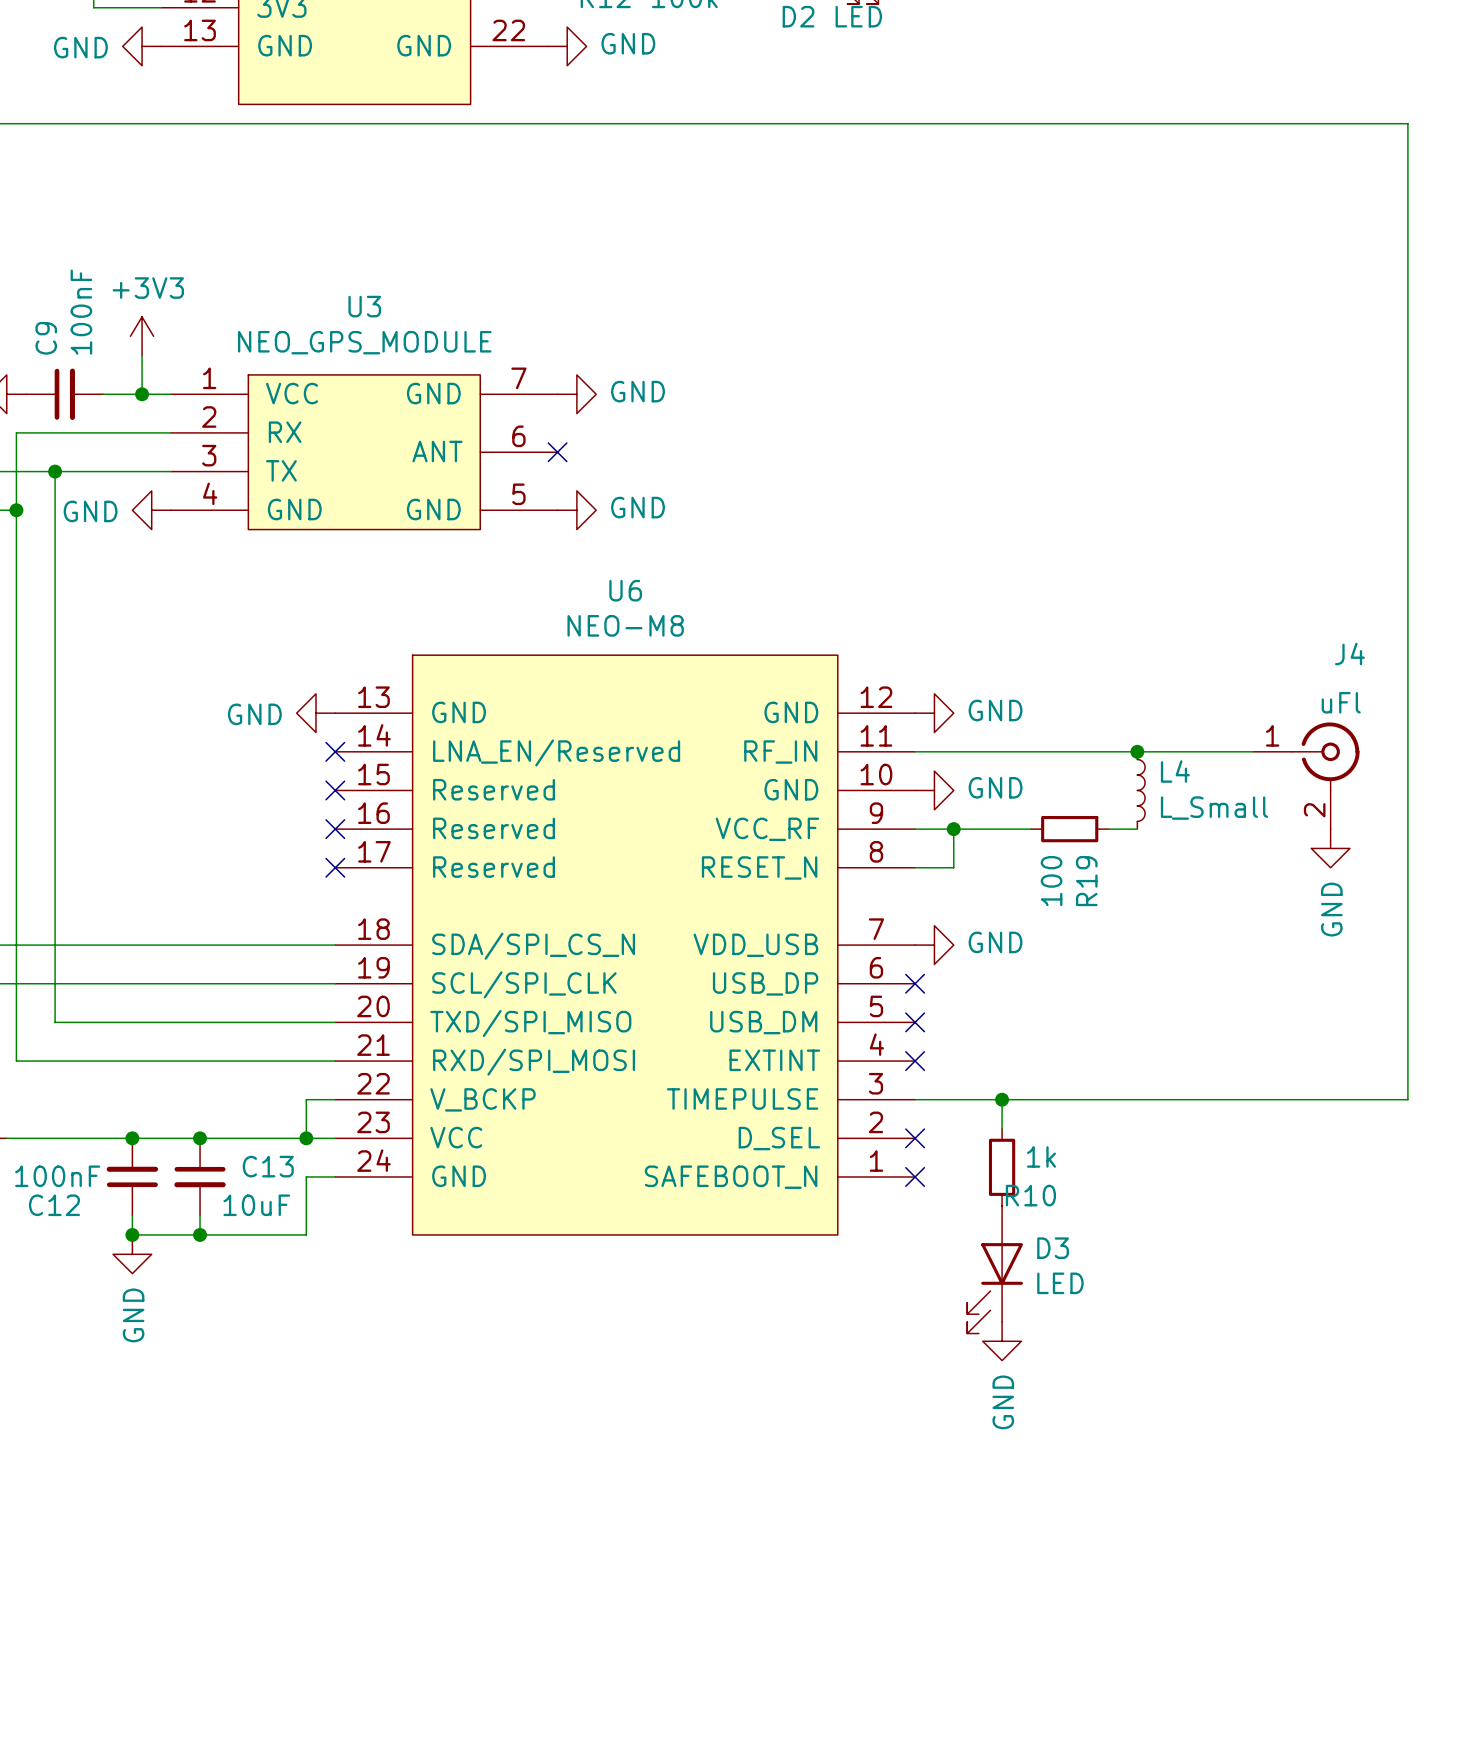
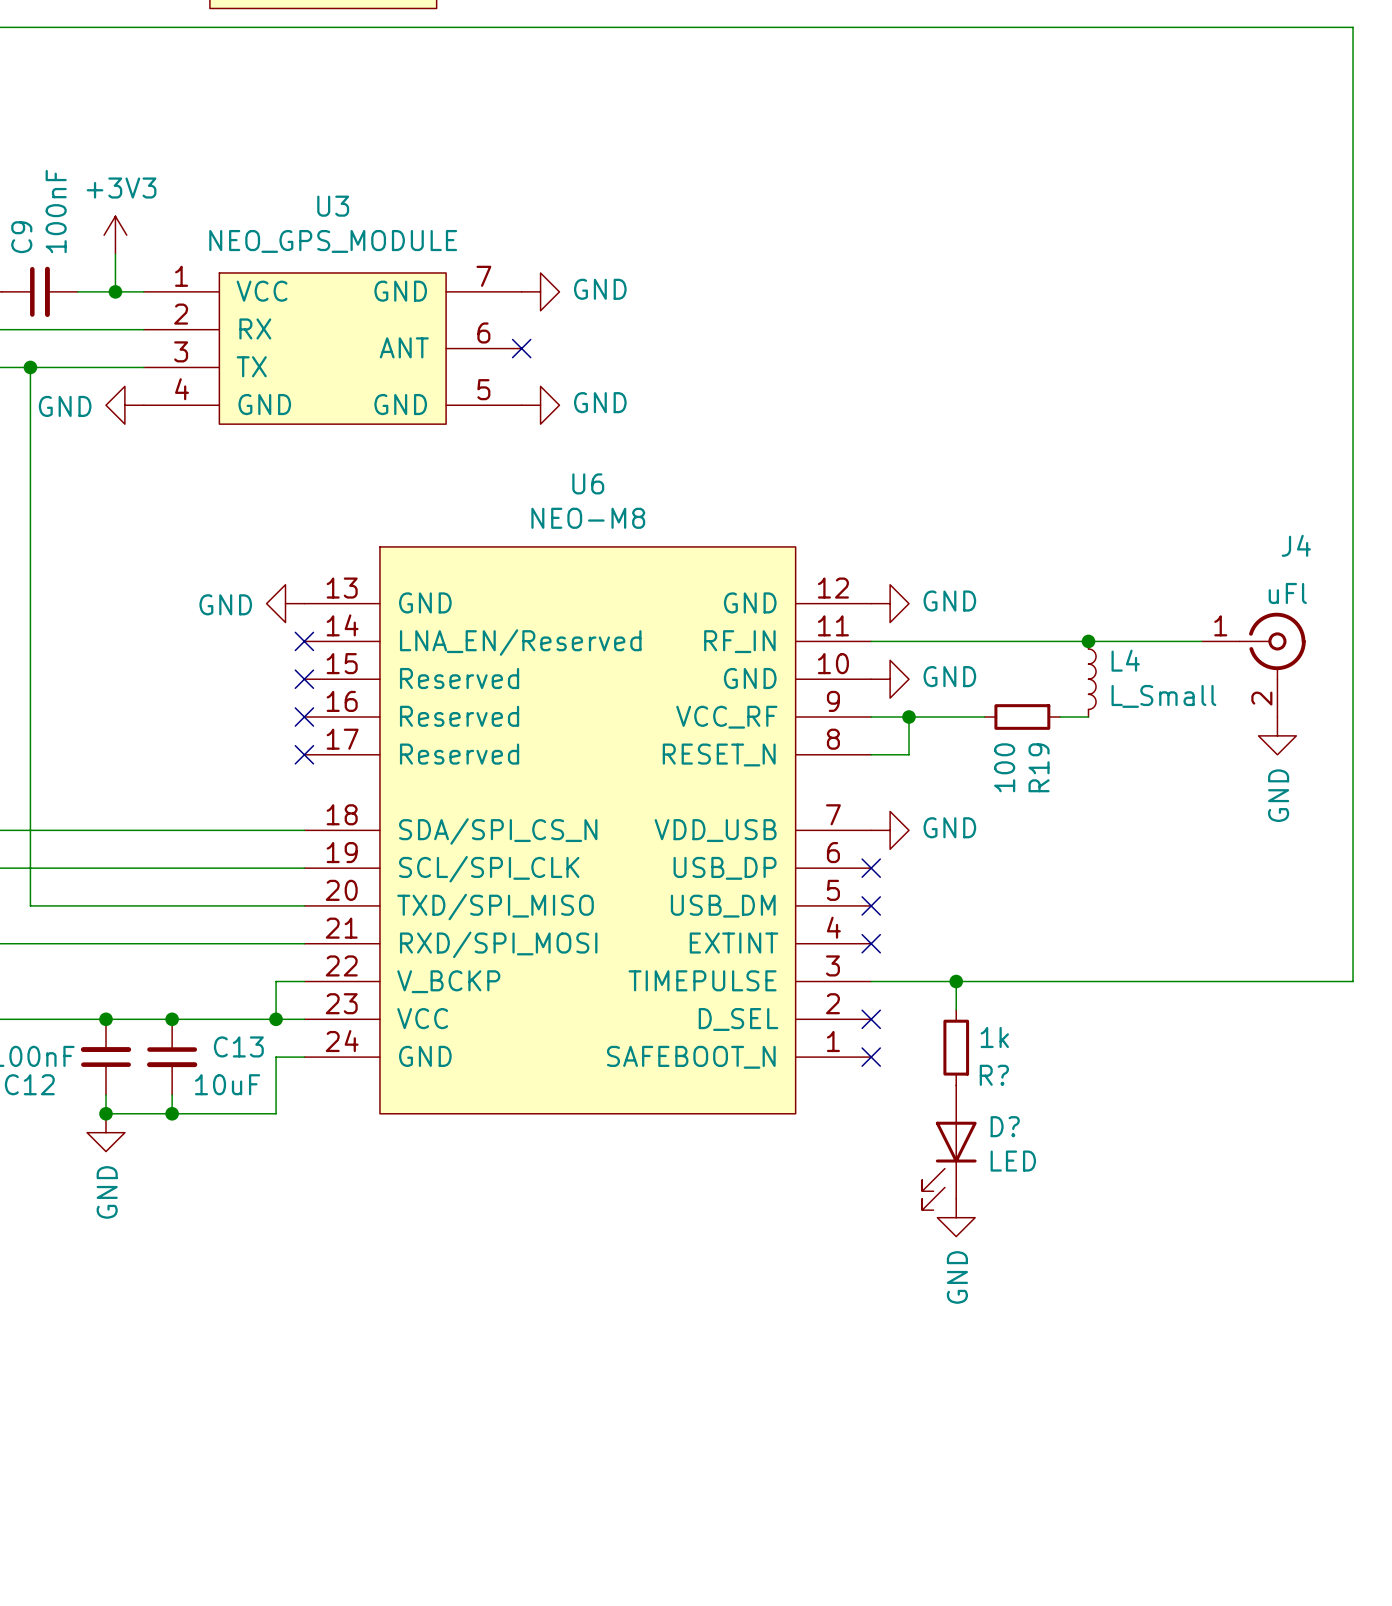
R10 name: R10 (1030, 1195) -> R? (994, 1075)
D3 name: D3 (1053, 1248) -> D? (1005, 1126)

